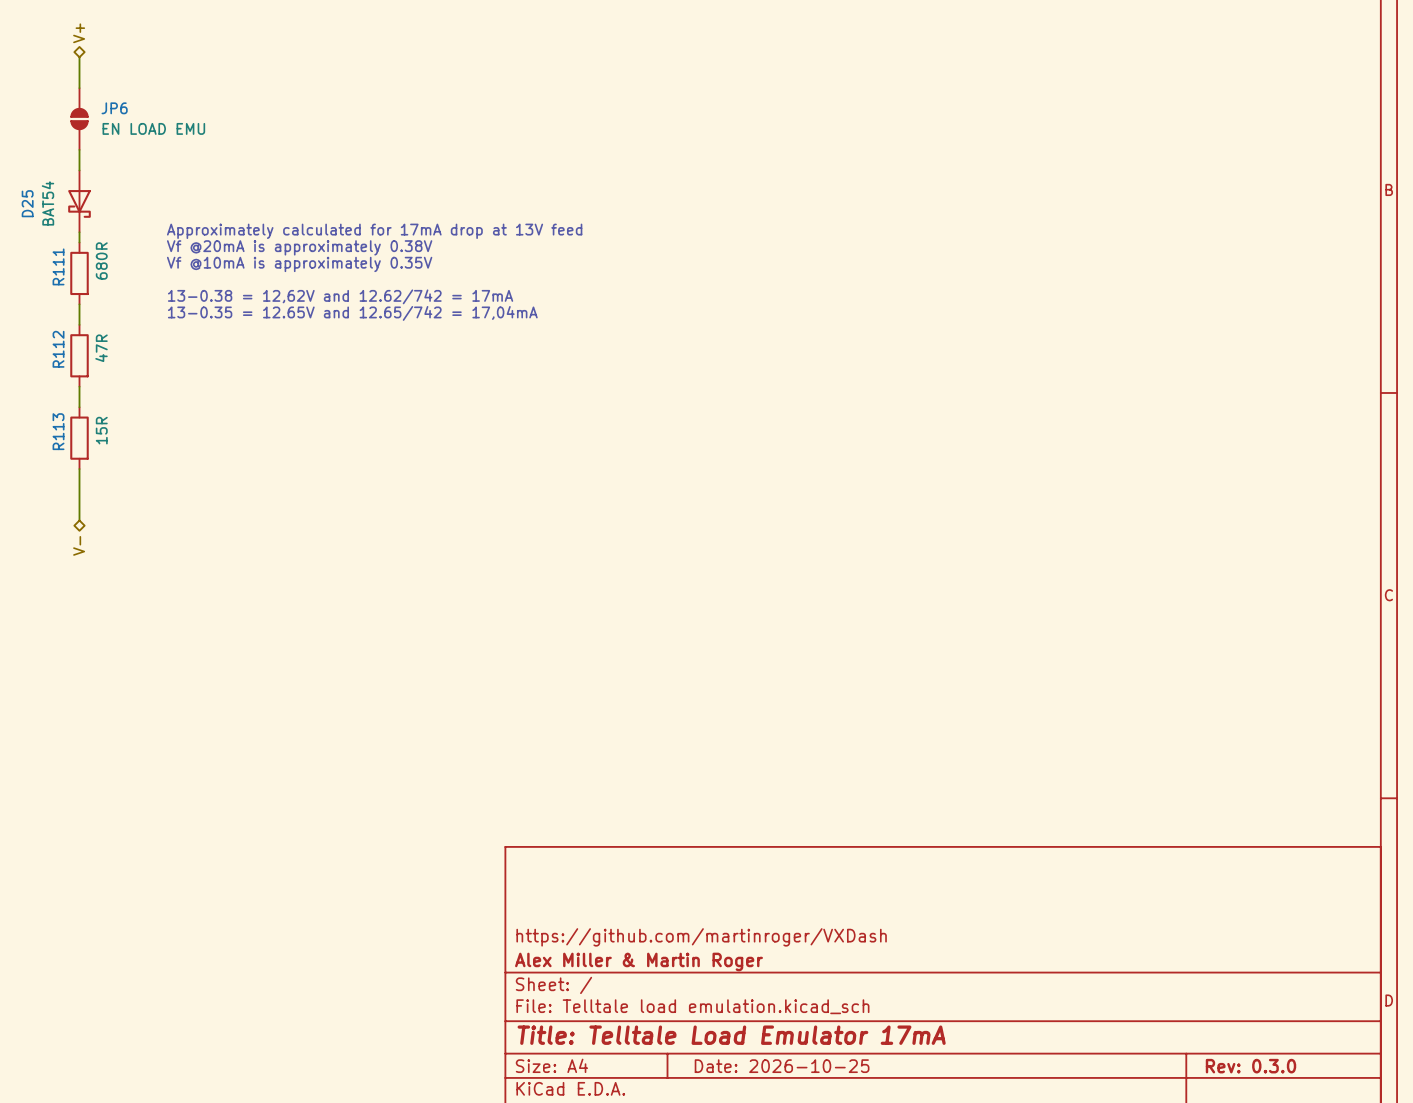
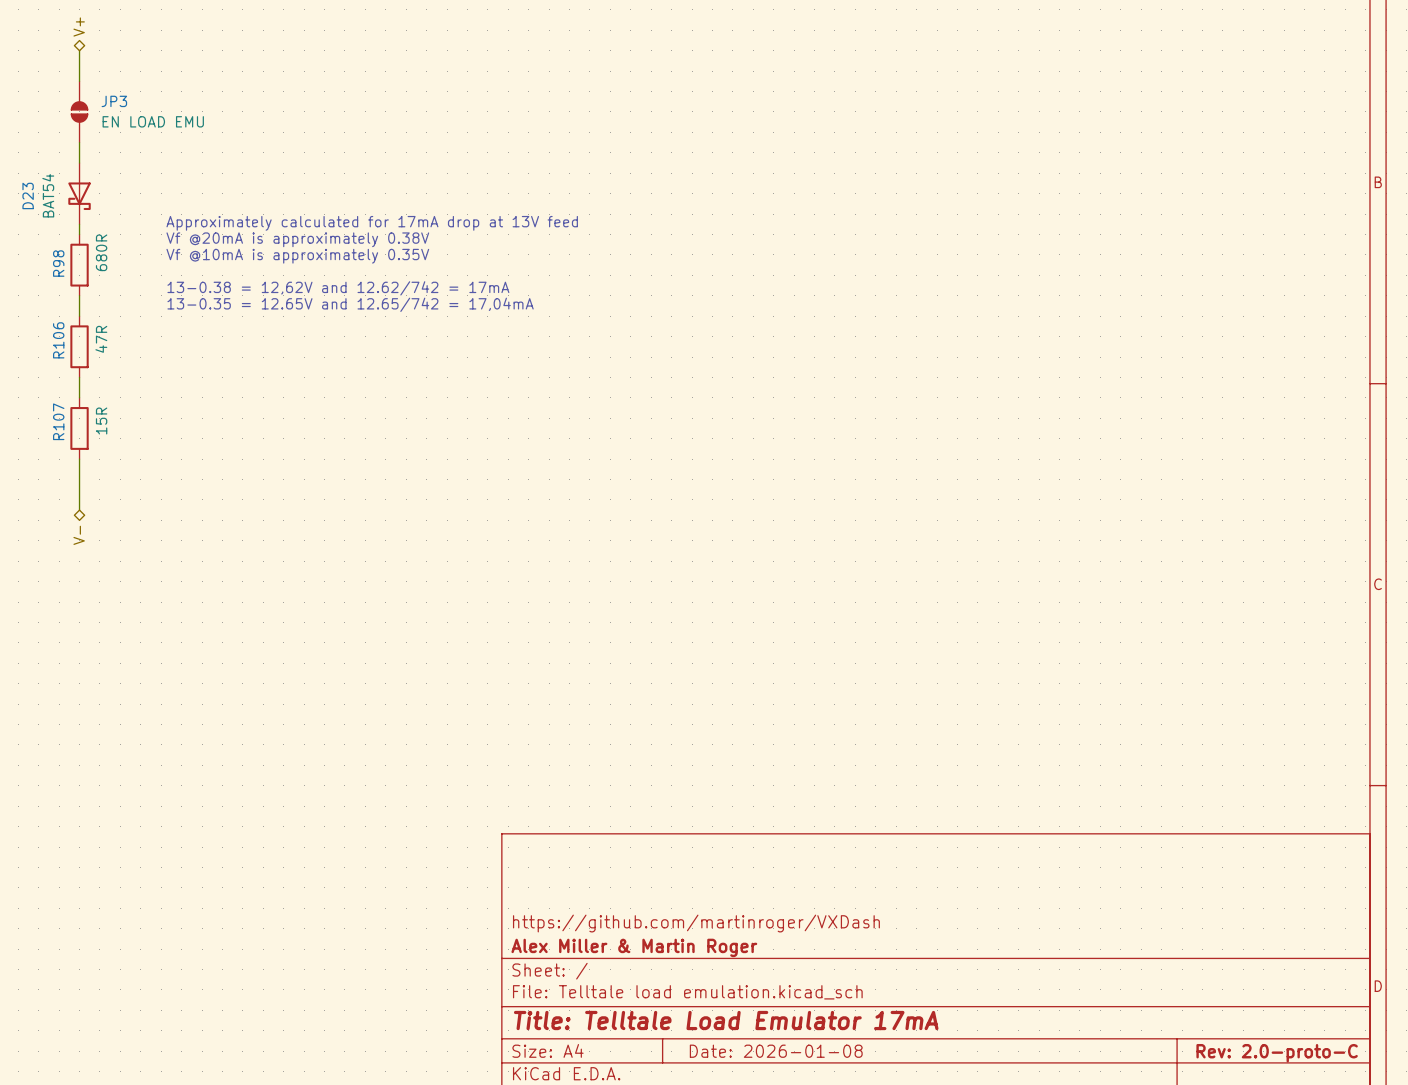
JP6 name: JP6 (114, 108) -> JP3 (114, 101)
D25 name: D25 (27, 203) -> D23 (28, 195)
R111 name: R111 (58, 266) -> R98 (58, 263)
R112 name: R112 (58, 349) -> R106 (58, 340)
R113 name: R113 (58, 431) -> R107 (58, 421)
title block: Date: 2026-10-25 (782, 1066) -> Date: 2026-01-08 (776, 1051)
title block: Rev: 0.3.0 (1250, 1066) -> Rev: 2.0-proto-C (1277, 1053)

